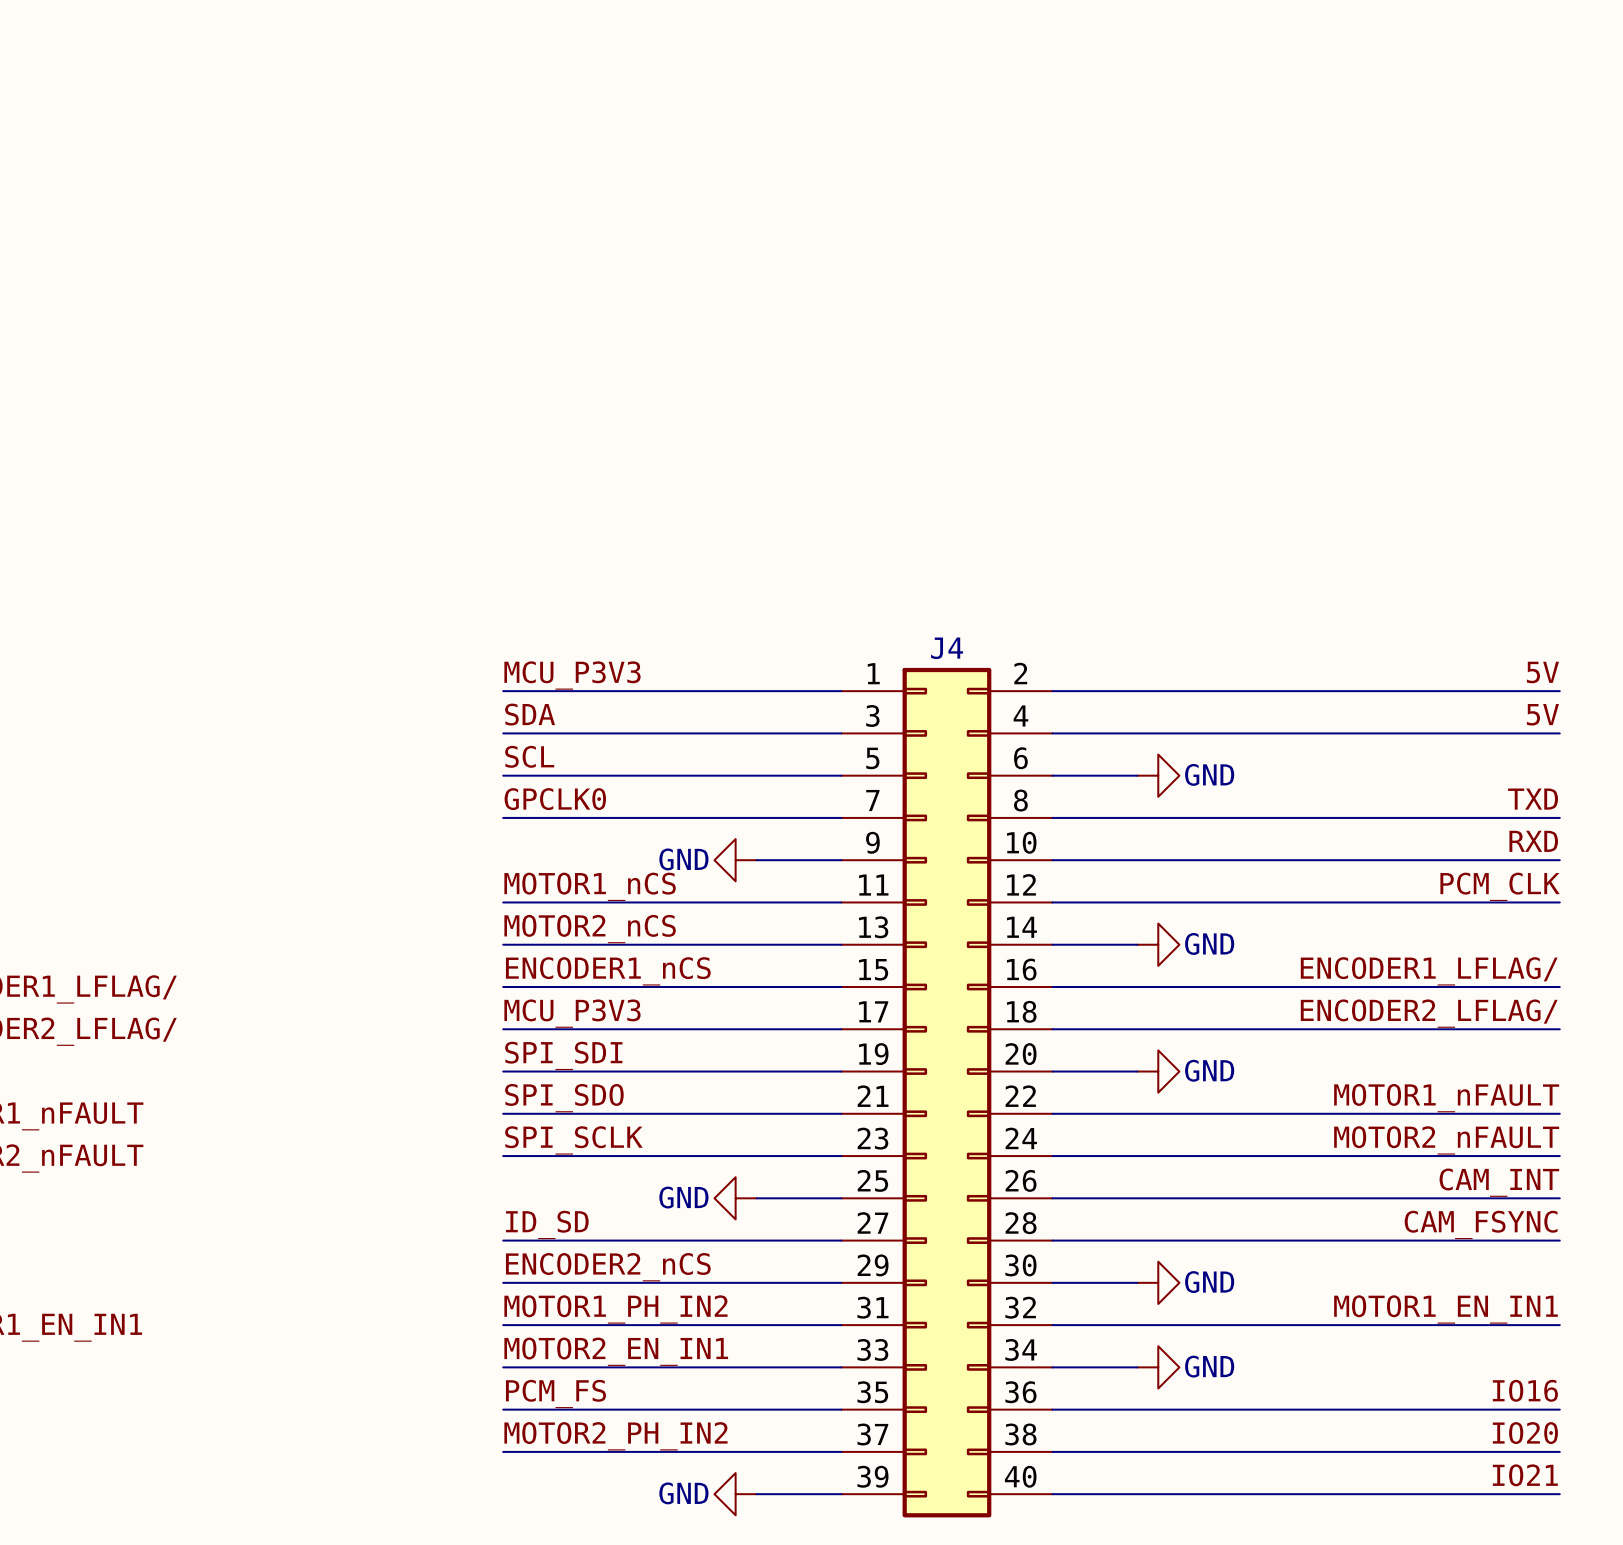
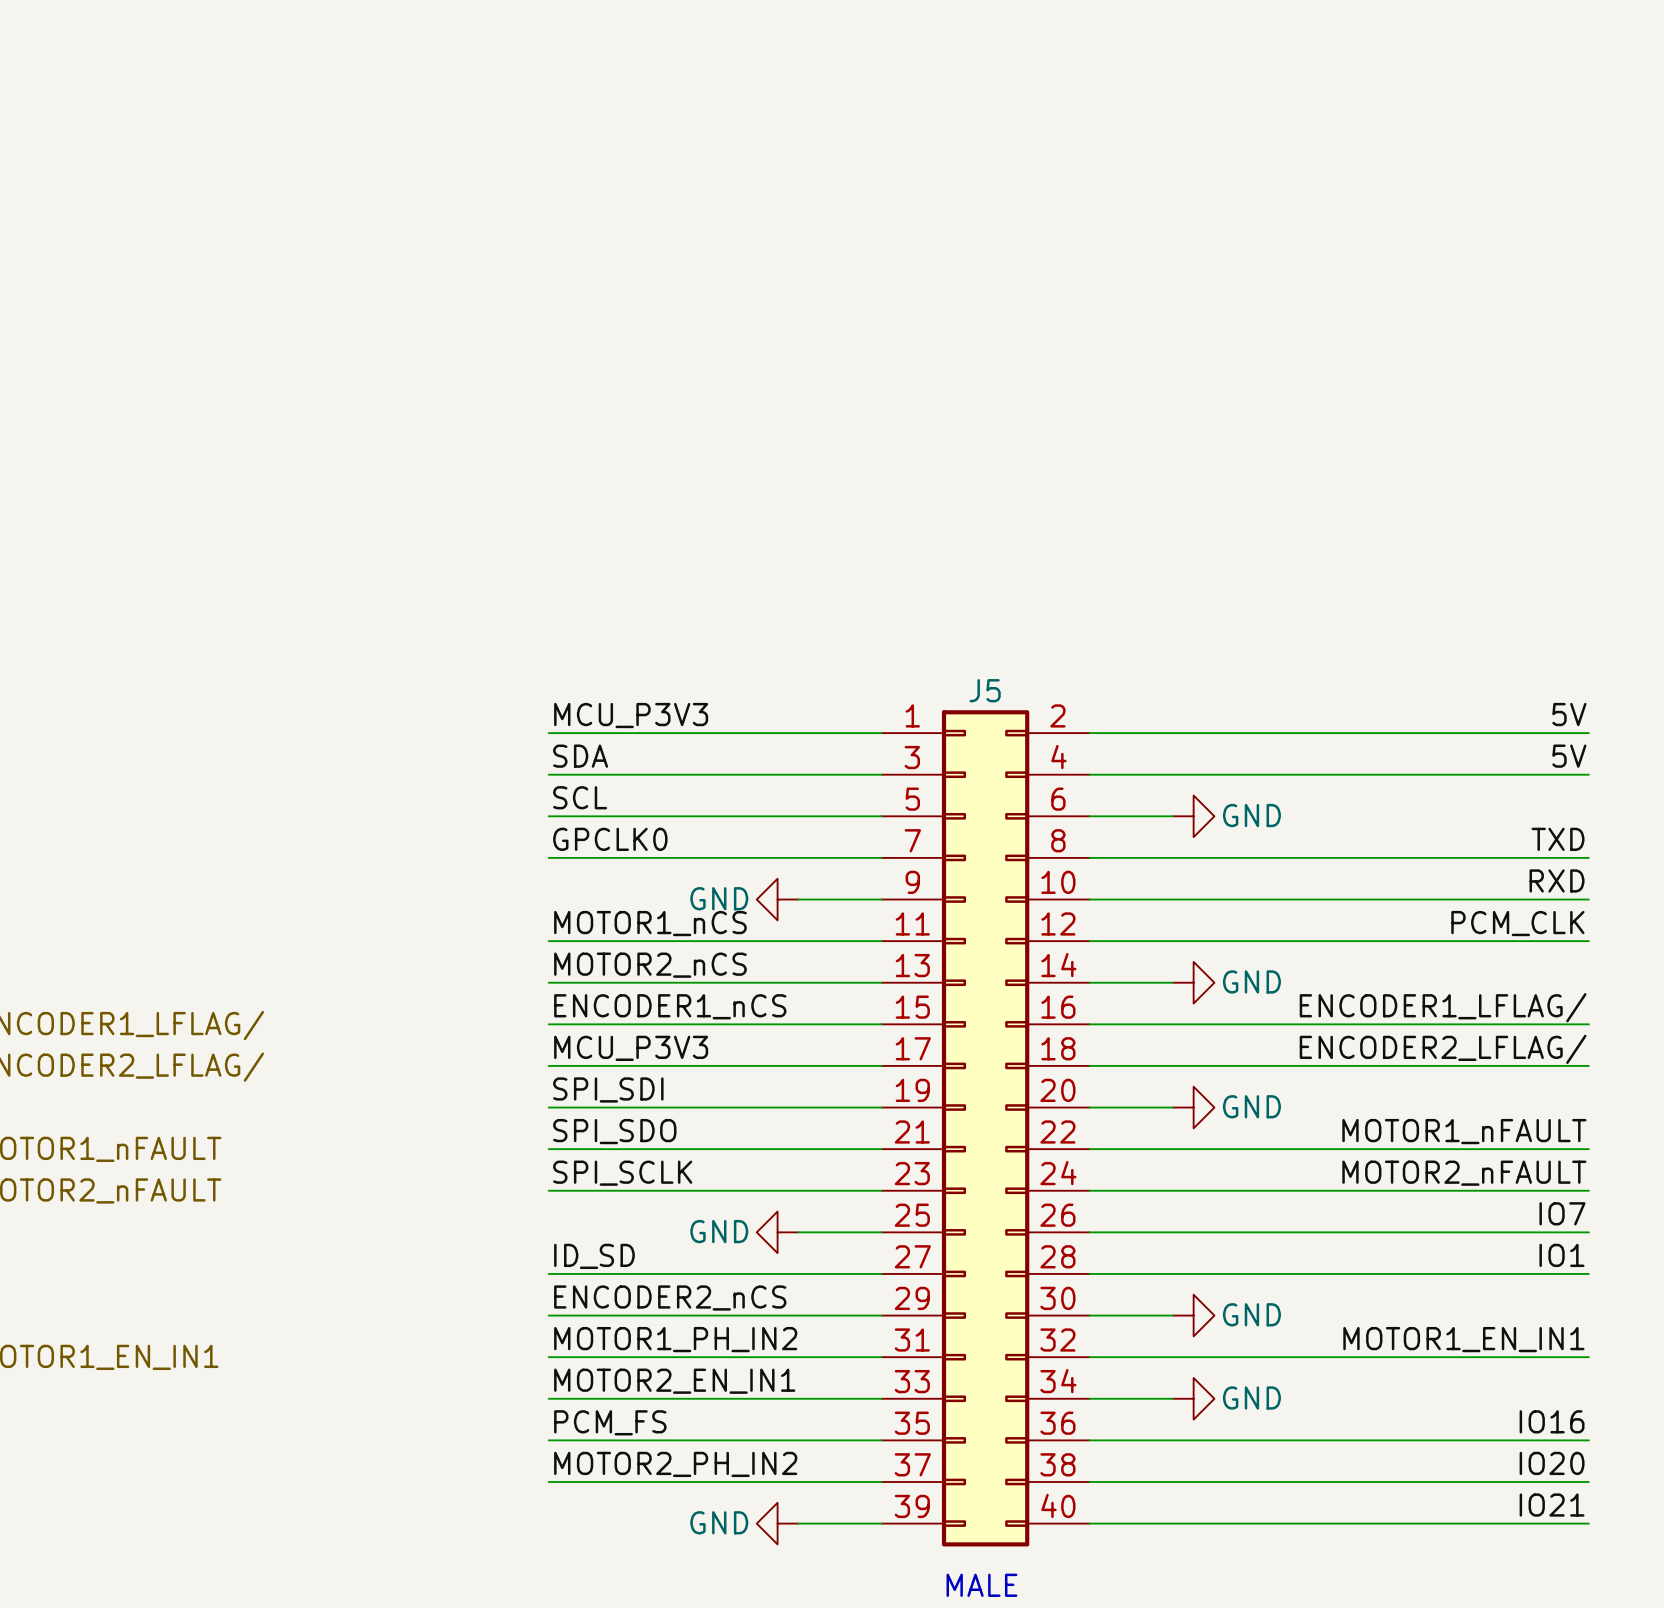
J4 name: J4 (947, 648) -> J5 (985, 690)
label: CAM_INT (1499, 1182) -> IO7 (1562, 1213)
label: CAM_FSYNC (1481, 1224) -> IO1 (1561, 1255)

